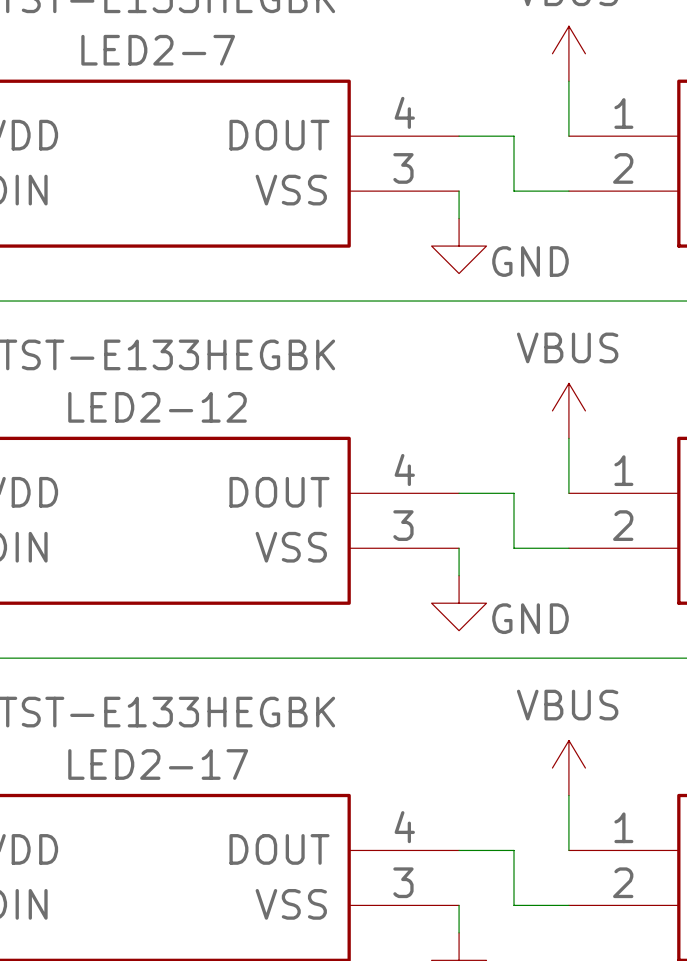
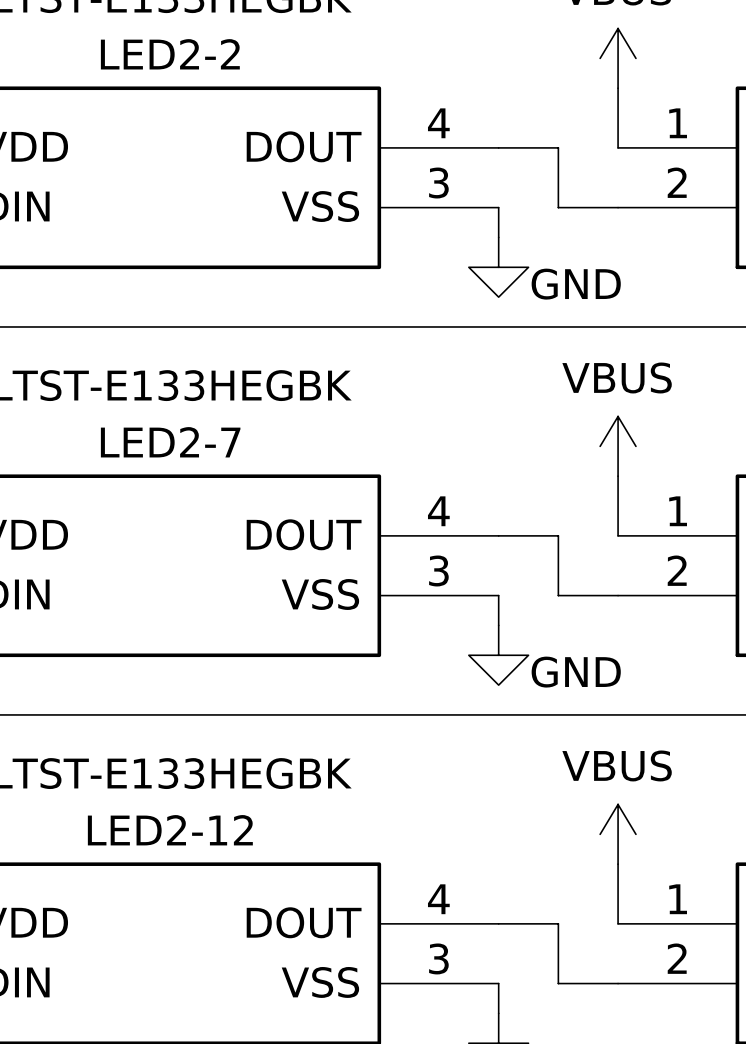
LED2-7 name: LED2-7 (158, 50) -> LED2-2 (170, 54)
LED2-12 name: LED2-12 (157, 407) -> LED2-7 (170, 442)
LED2-17 name: LED2-17 (158, 764) -> LED2-12 (170, 830)

